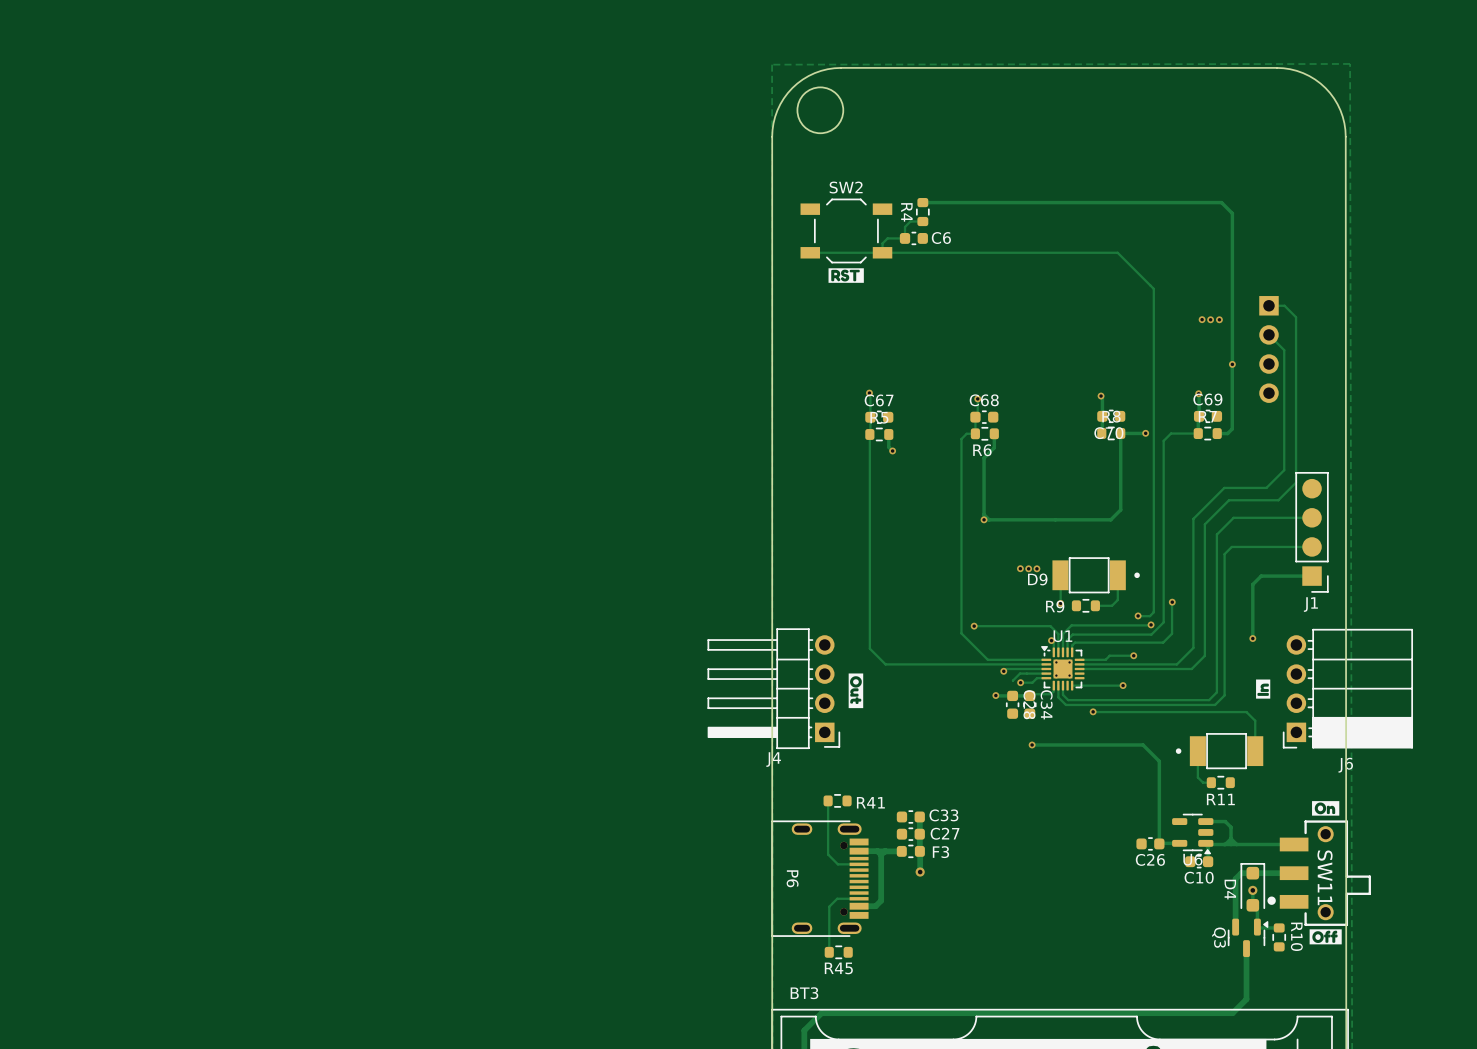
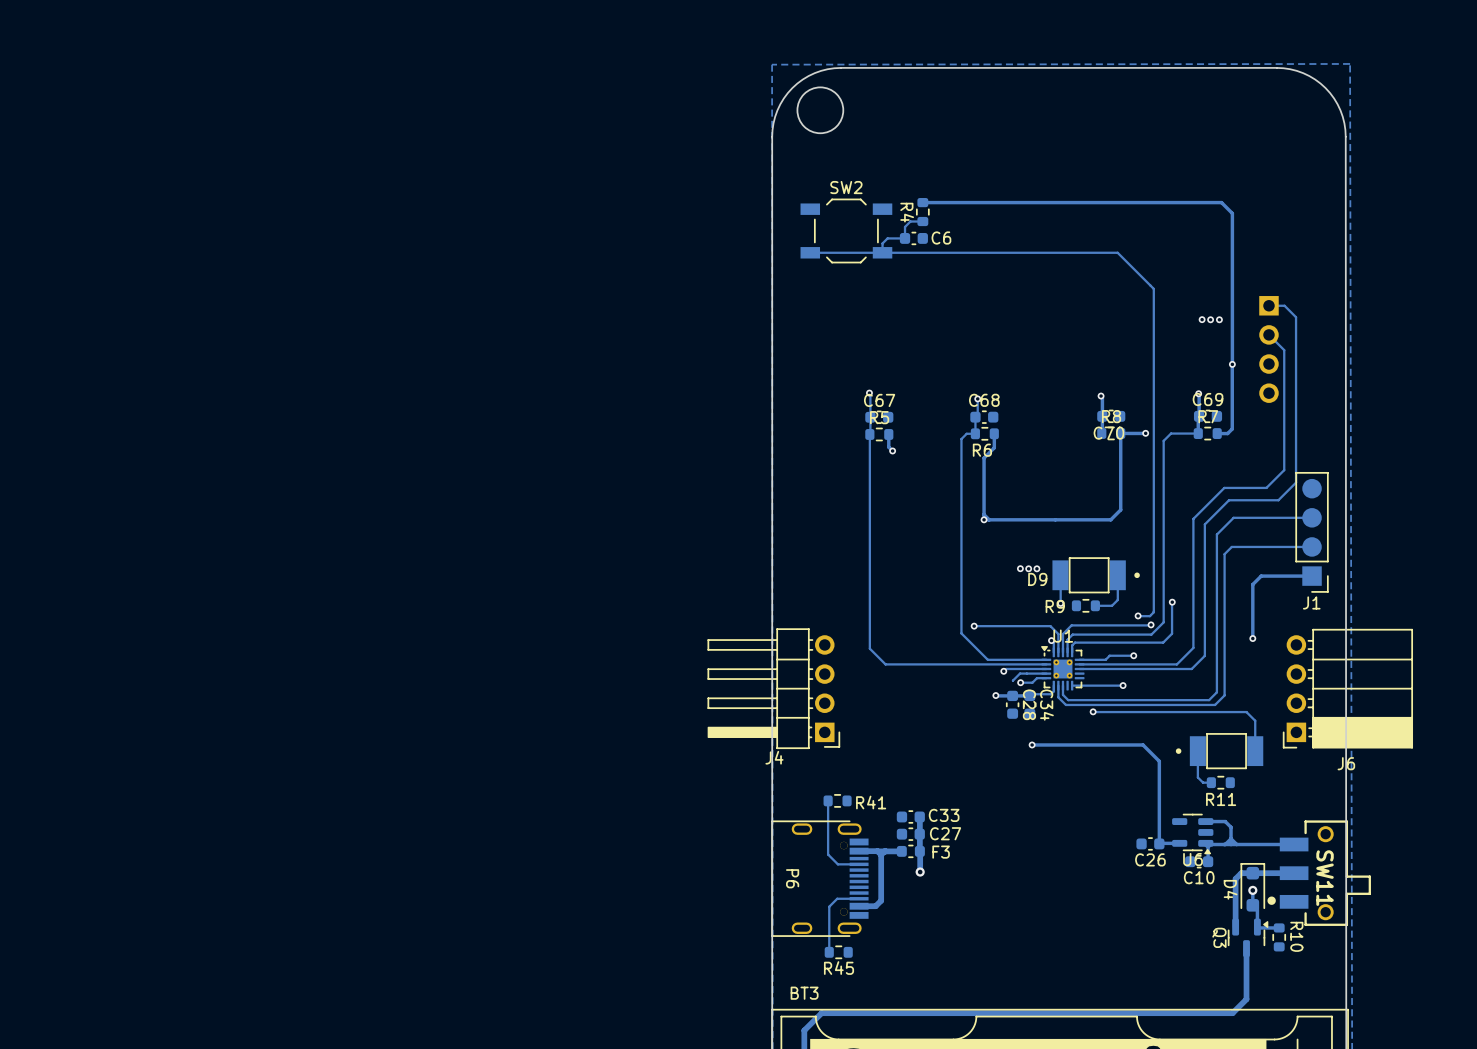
drawing: [828, 268, 864, 283] -> none
drawing: [848, 673, 864, 709] -> none
drawing: [1256, 679, 1271, 699] -> none
drawing: [1312, 801, 1340, 816] -> none
drawing: [1309, 929, 1342, 945] -> none

